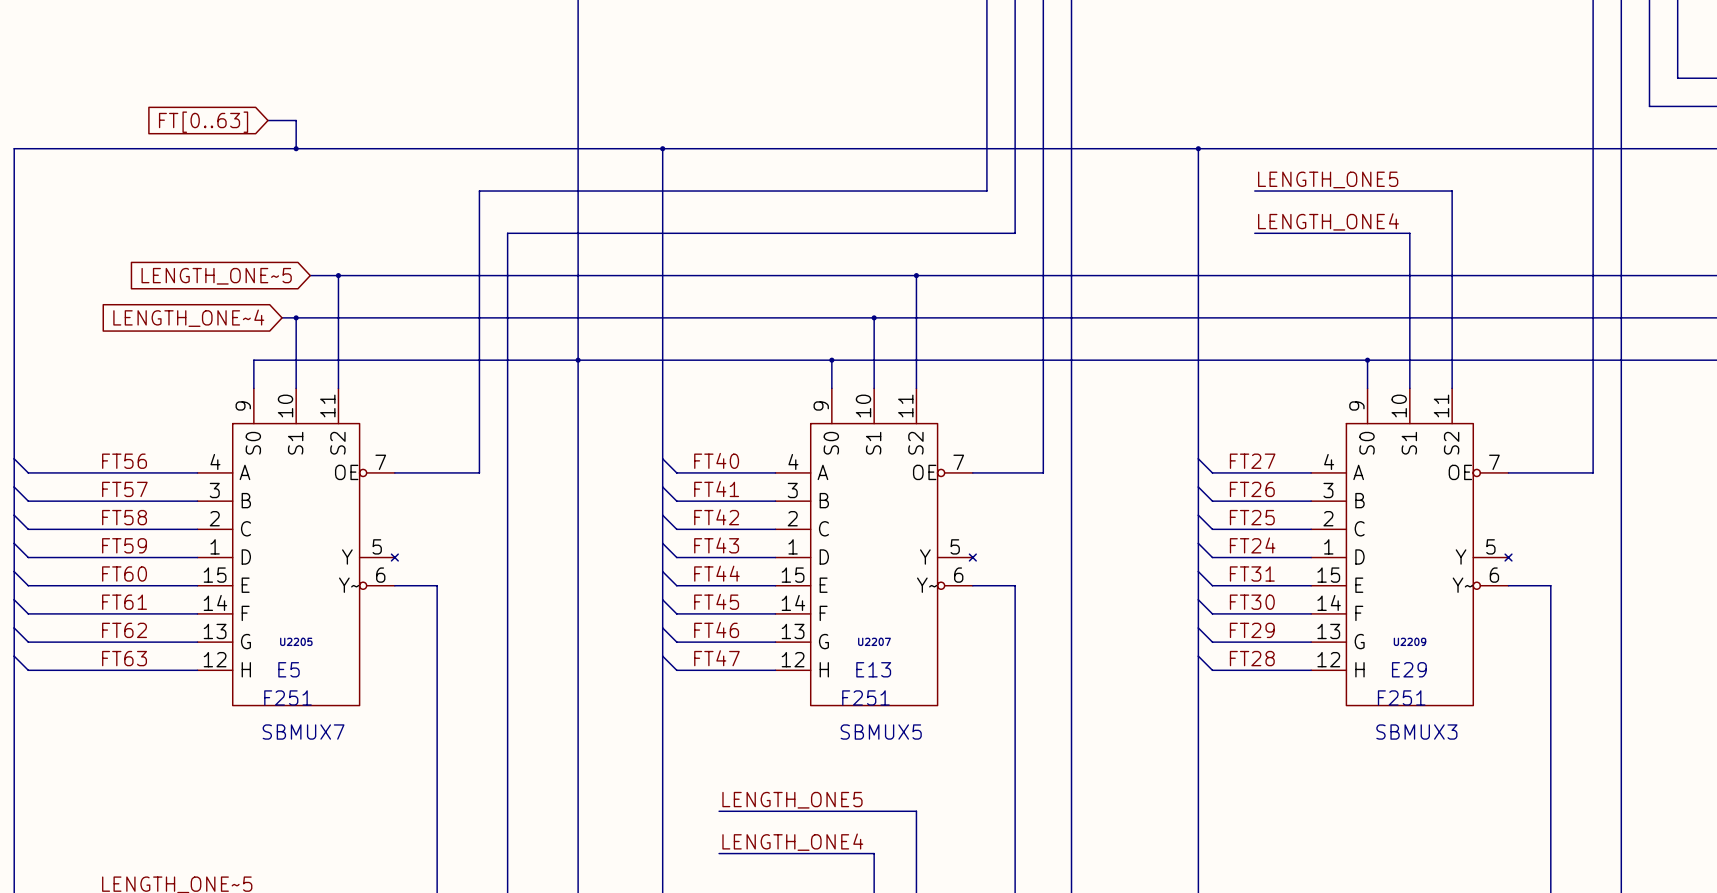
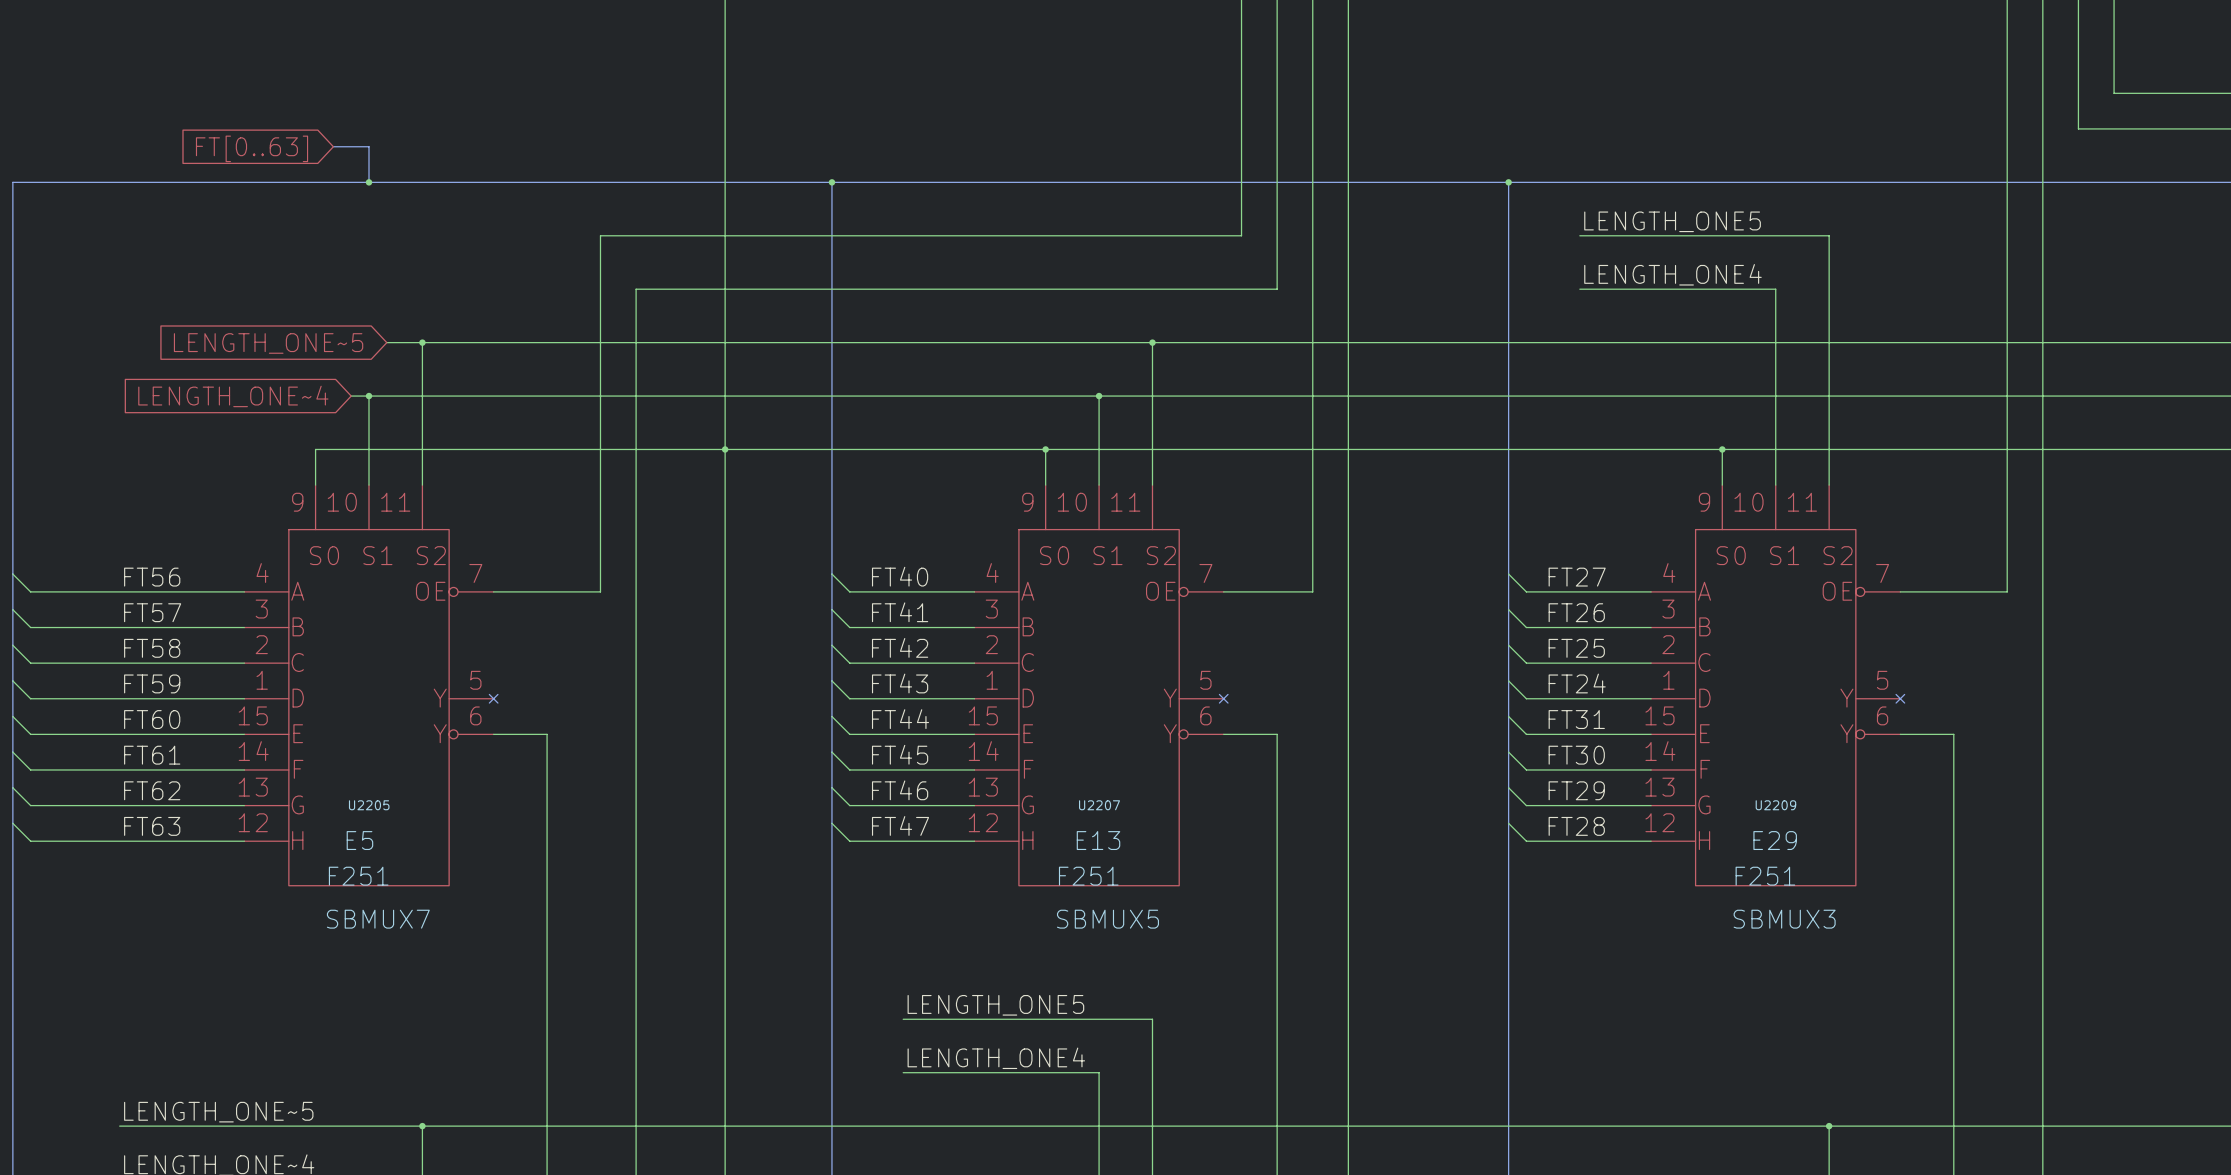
U2205 symbol: [197, 388, 395, 706] -> [244, 485, 494, 886]
U2207 symbol: [775, 388, 973, 706] -> [974, 485, 1224, 886]
U2209 symbol: [1311, 388, 1509, 706] -> [1651, 485, 1901, 886]

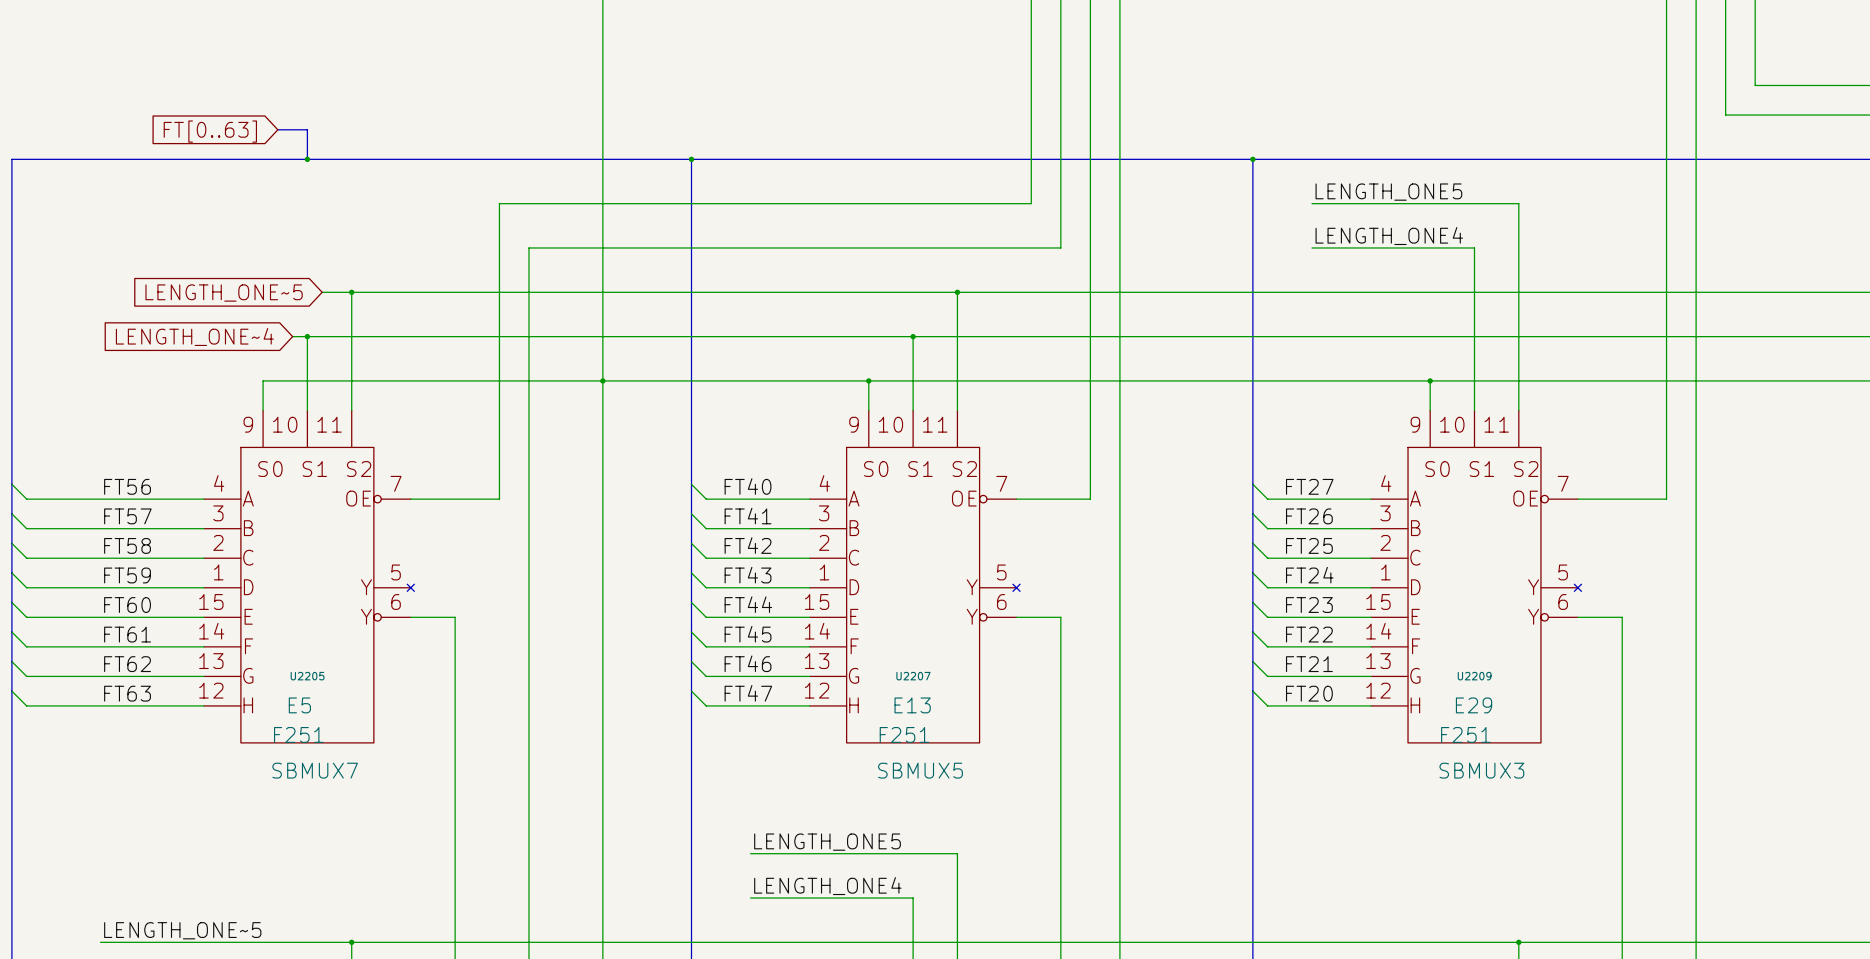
label: FT31 (1576, 719) -> FT23 (1309, 605)
label: FT30 (1576, 755) -> FT22 (1309, 634)
label: FT29 (1576, 790) -> FT21 (1309, 664)
label: FT28 (1576, 826) -> FT20 (1309, 693)

